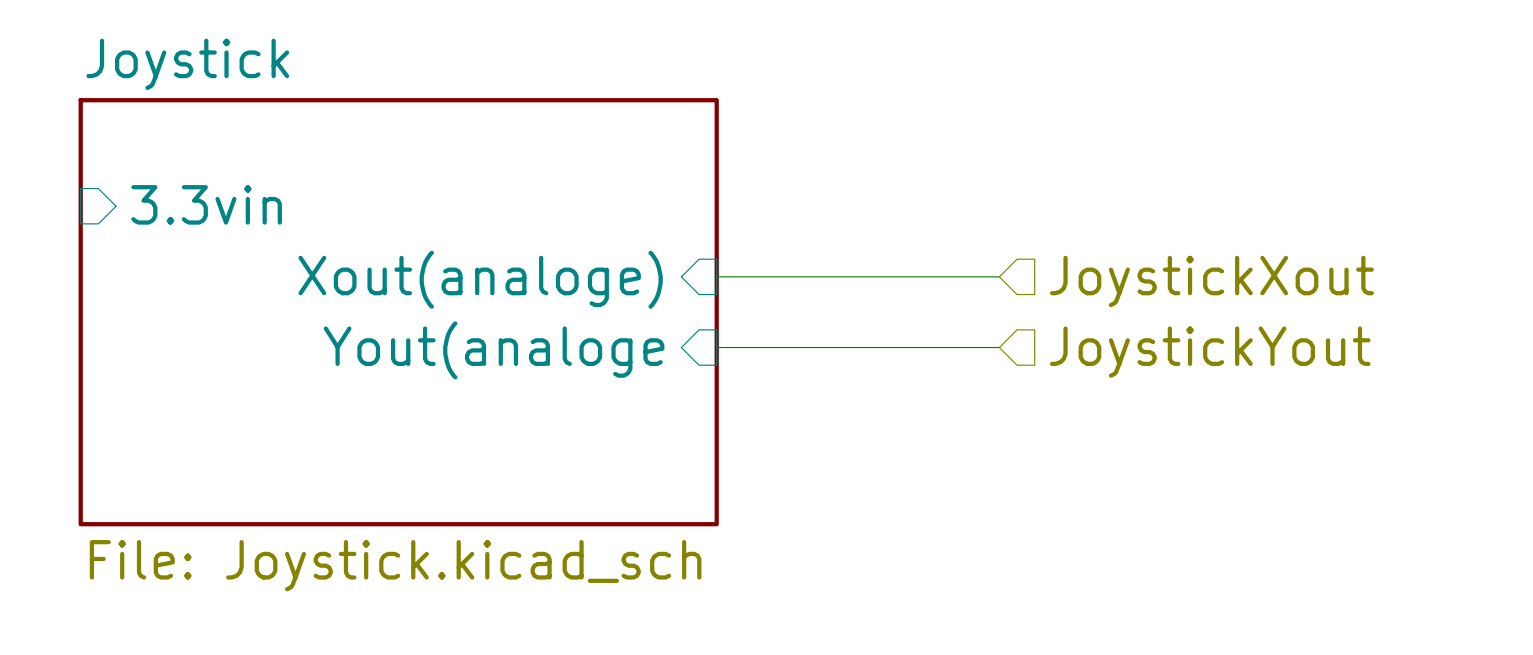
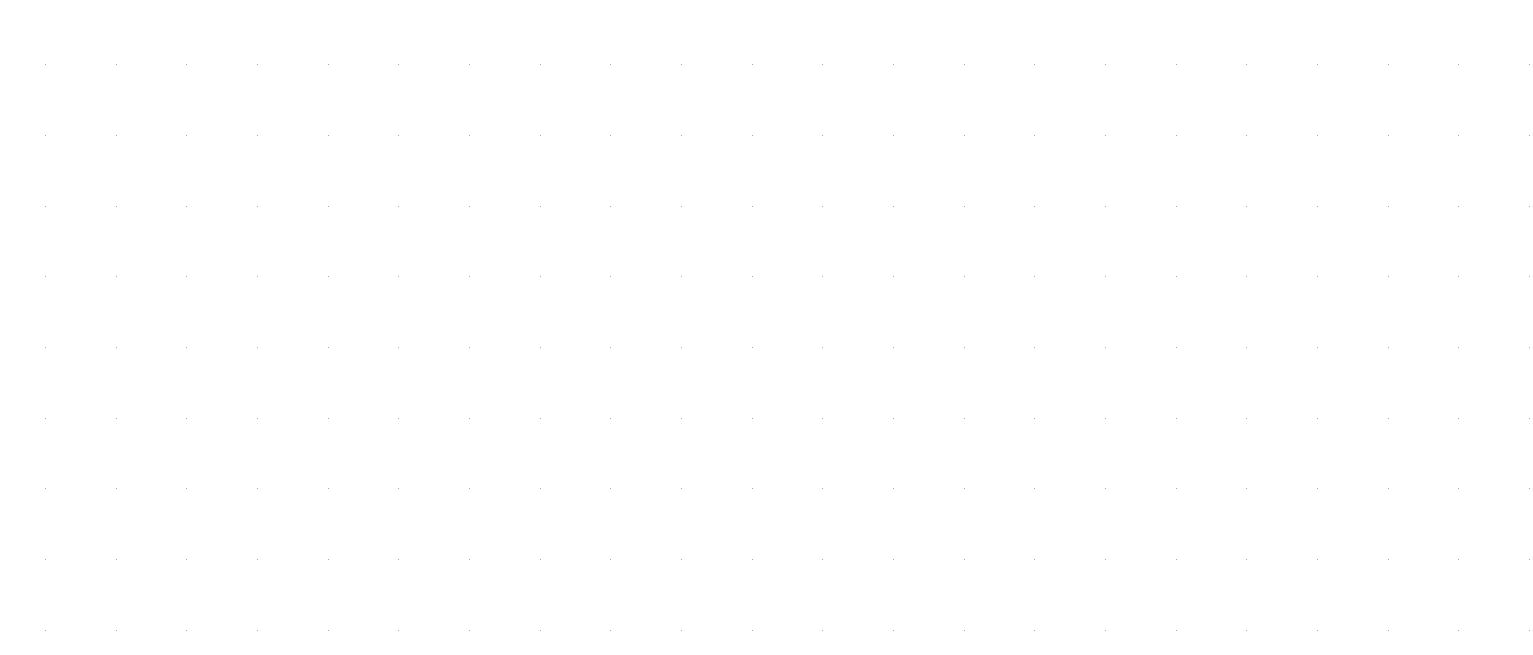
sheet pin: 3.3vin (206, 204) -> none
wire: (716, 276) (999, 276) -> none
sheet pin: Xout(analoge) (480, 279) -> none
hierarchical label: JoystickXout (1211, 281) -> none
sheet Joystick: File: Joystick.kicad_sch (398, 312) -> none
wire: (716, 347) (999, 347) -> none
sheet pin: Yout(analoge (494, 350) -> none
hierarchical label: JoystickYout (1210, 352) -> none

